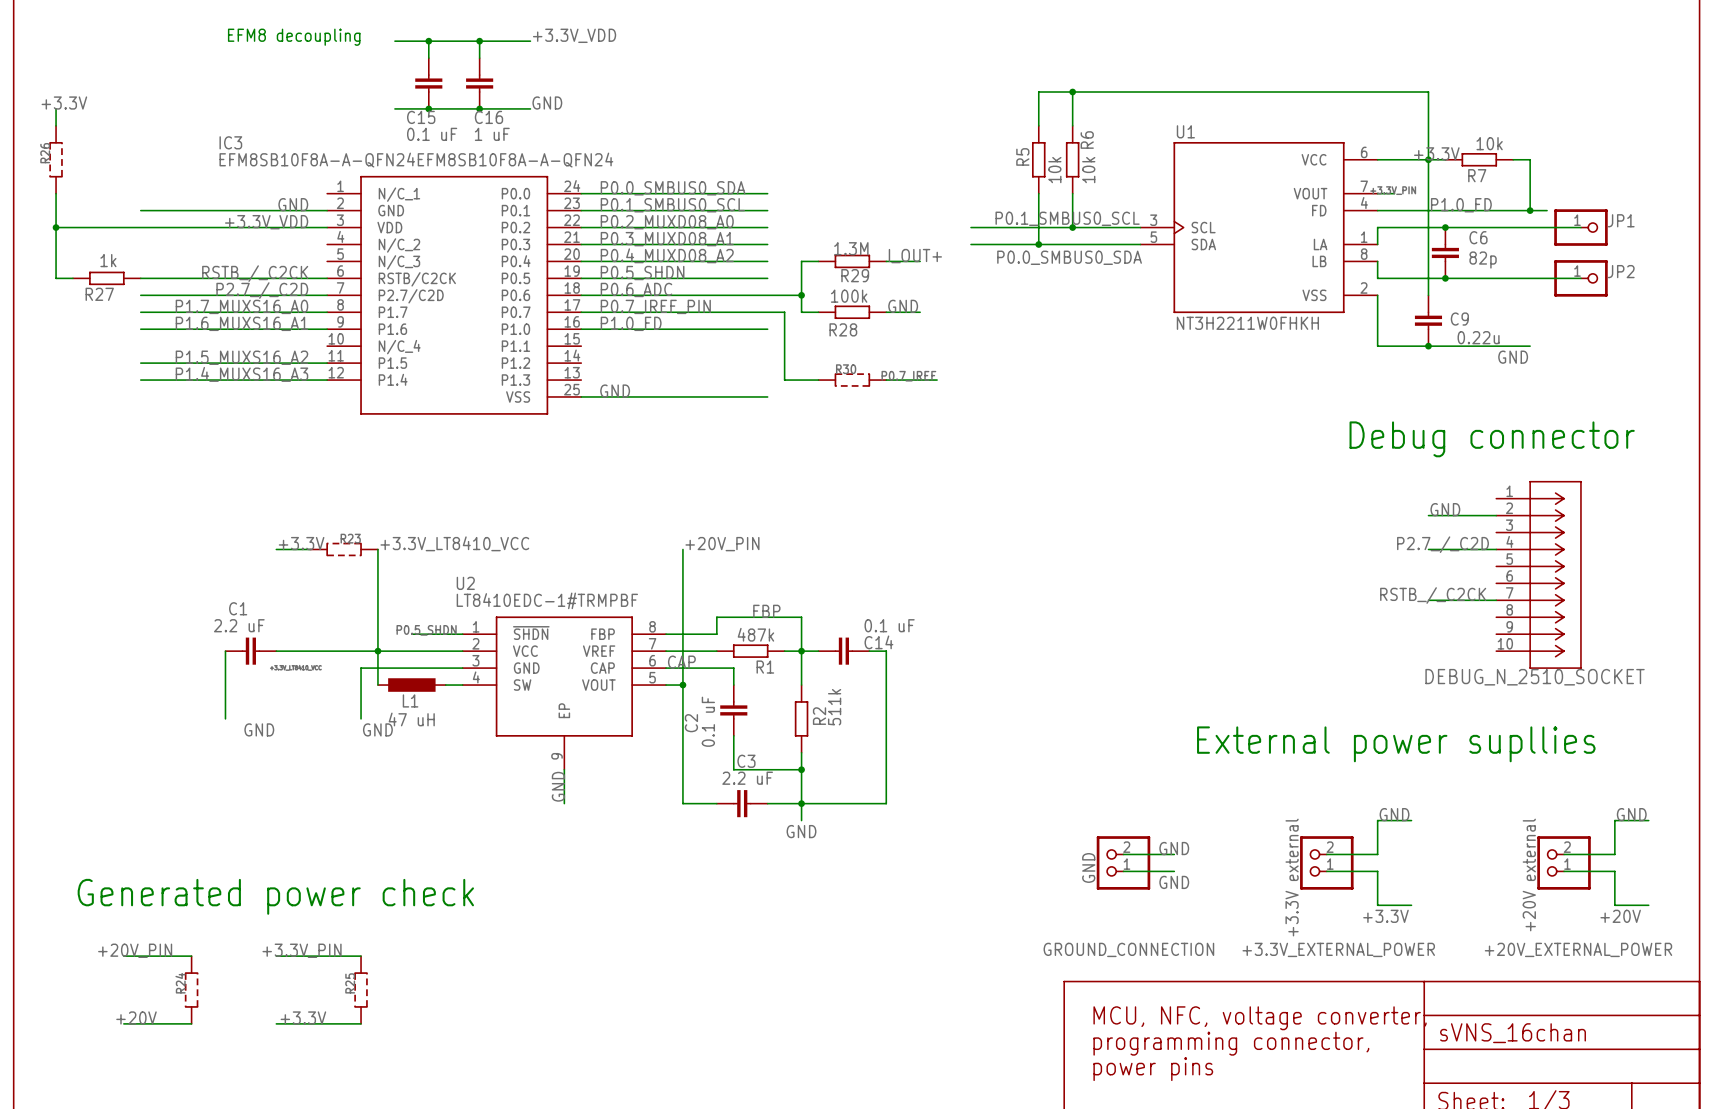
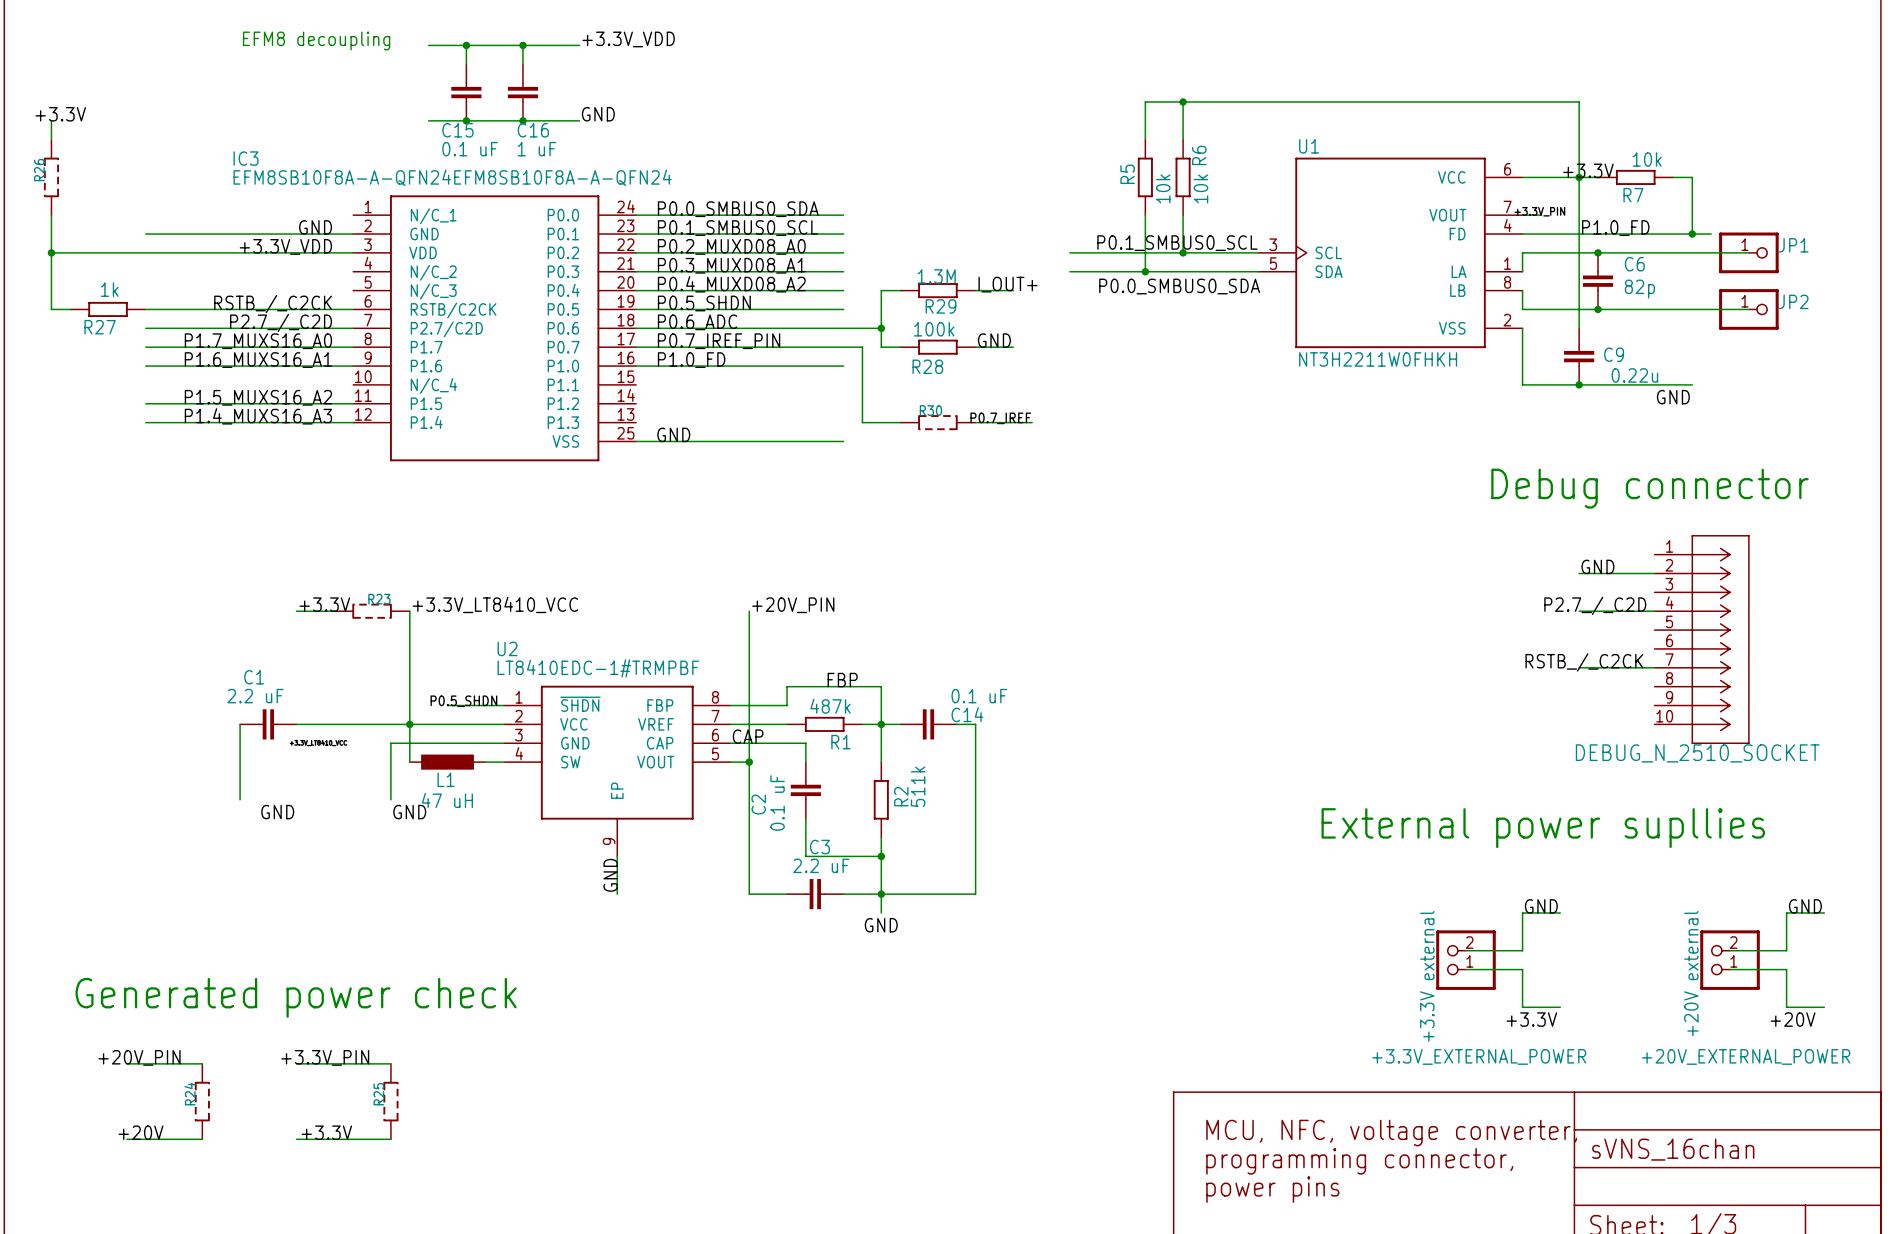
label: GND (1174, 848) -> none
wire: (1123, 854) (1174, 854) -> none
GROUND_CONNECTION: GND (1123, 862) -> none
wire: (1123, 871) (1174, 871) -> none
label: GND (1174, 882) -> none

